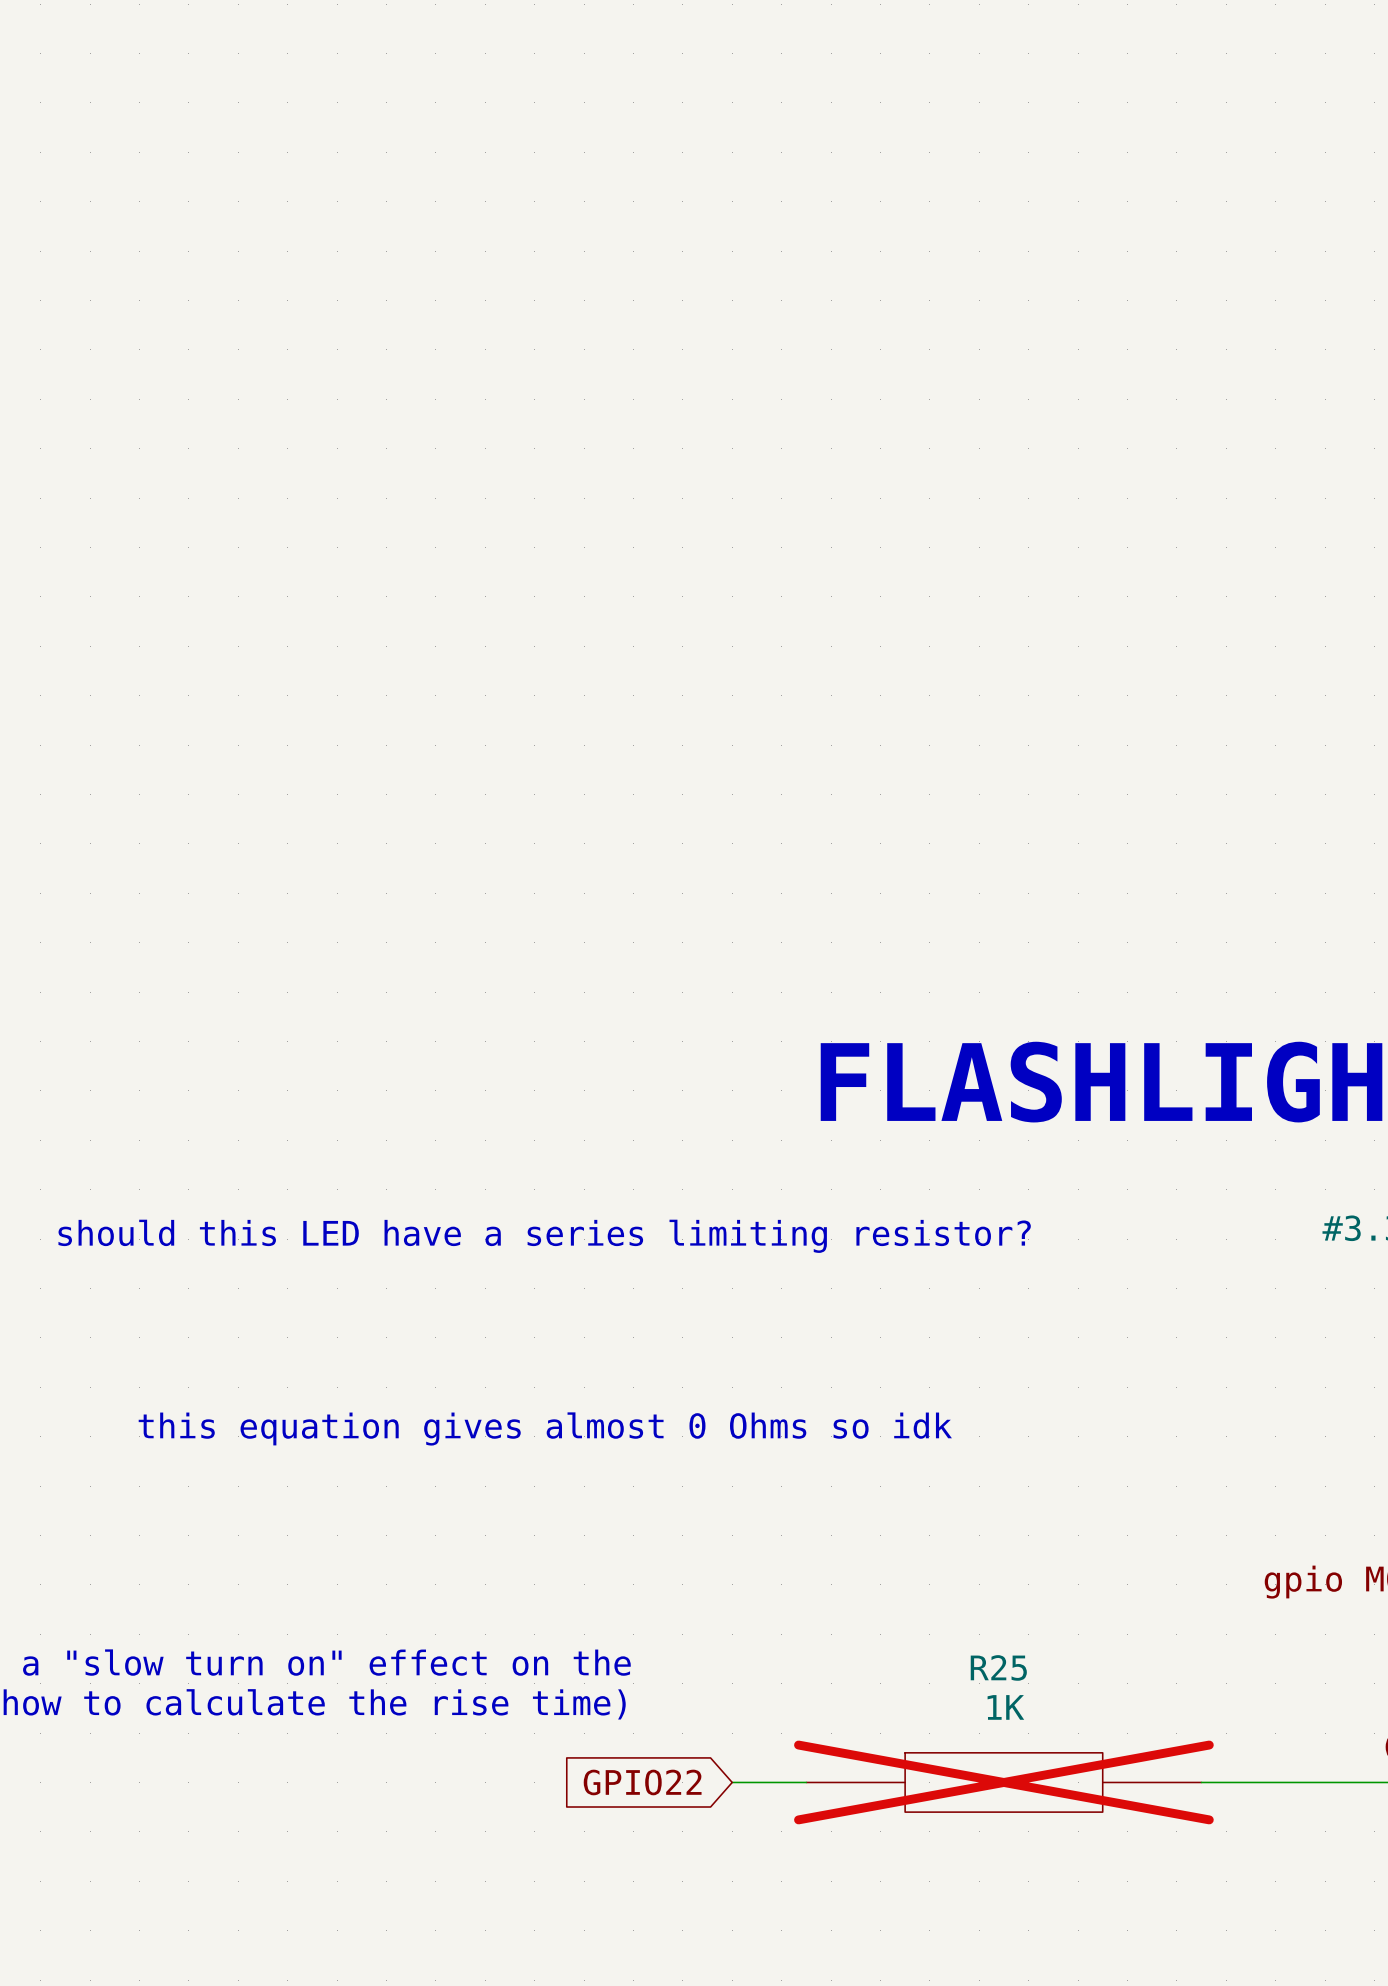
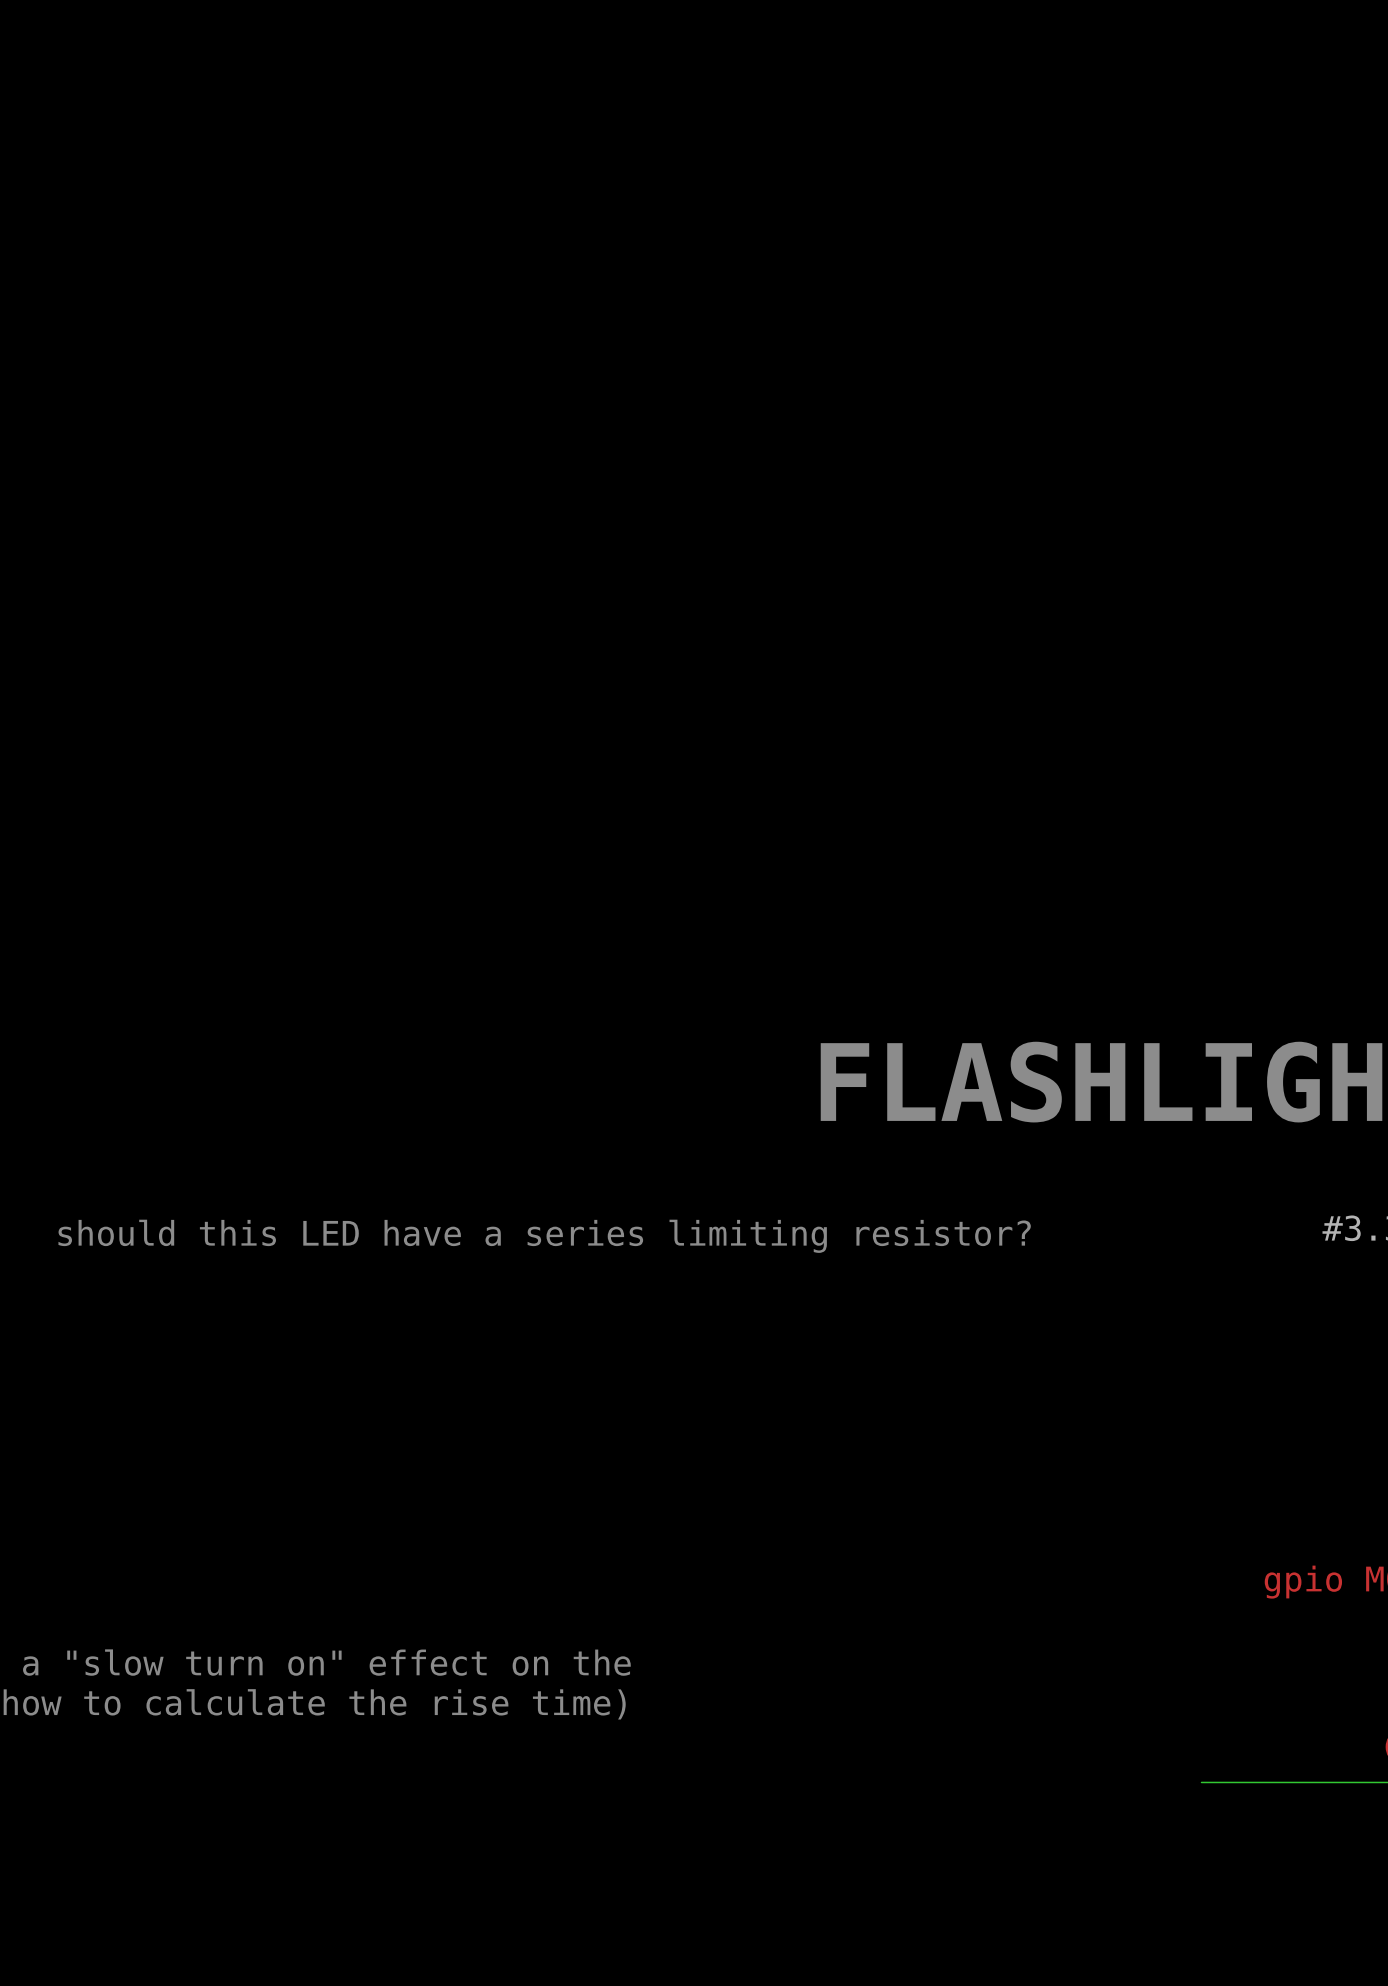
text: this equation gives almost 0 Ohms so idk (545, 1428) -> none
global label: GPIO22 (642, 1782) -> none
wire: (732, 1782) (806, 1782) -> none
R25: 1K (1003, 1782) -> none

